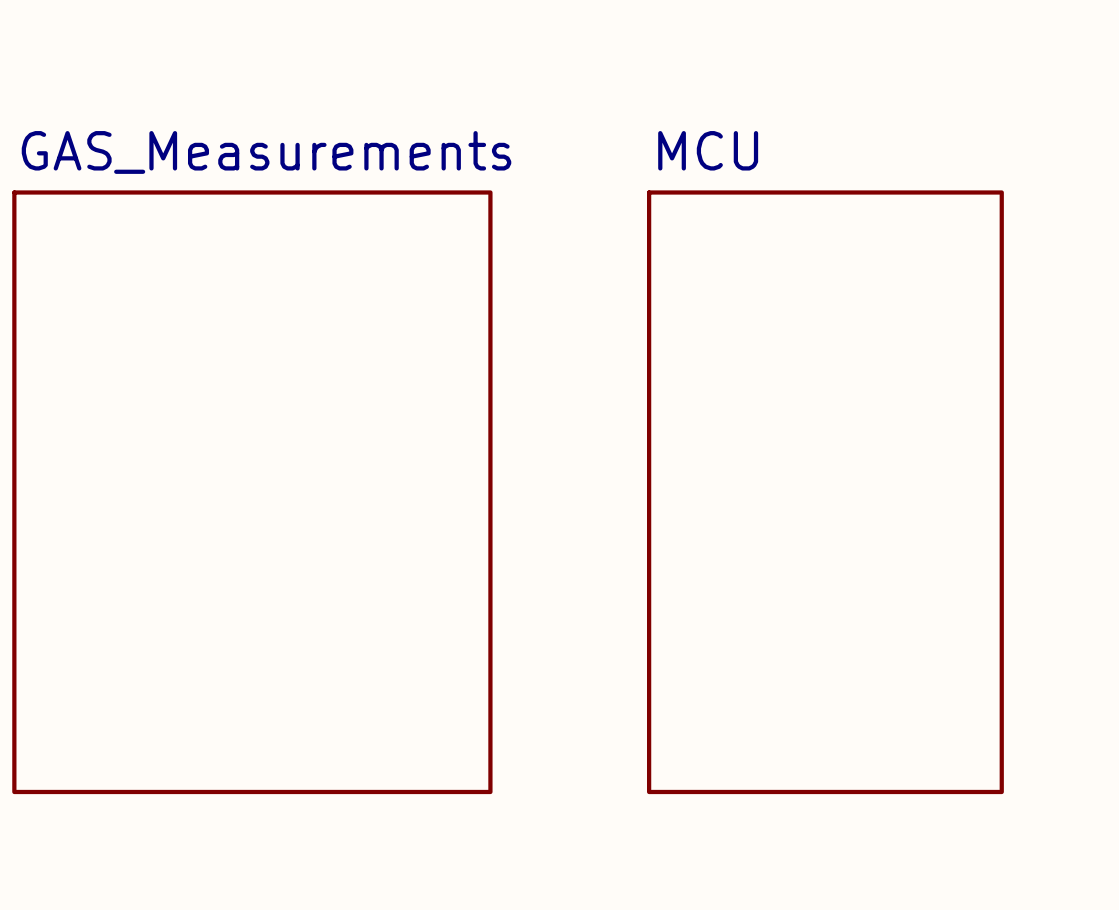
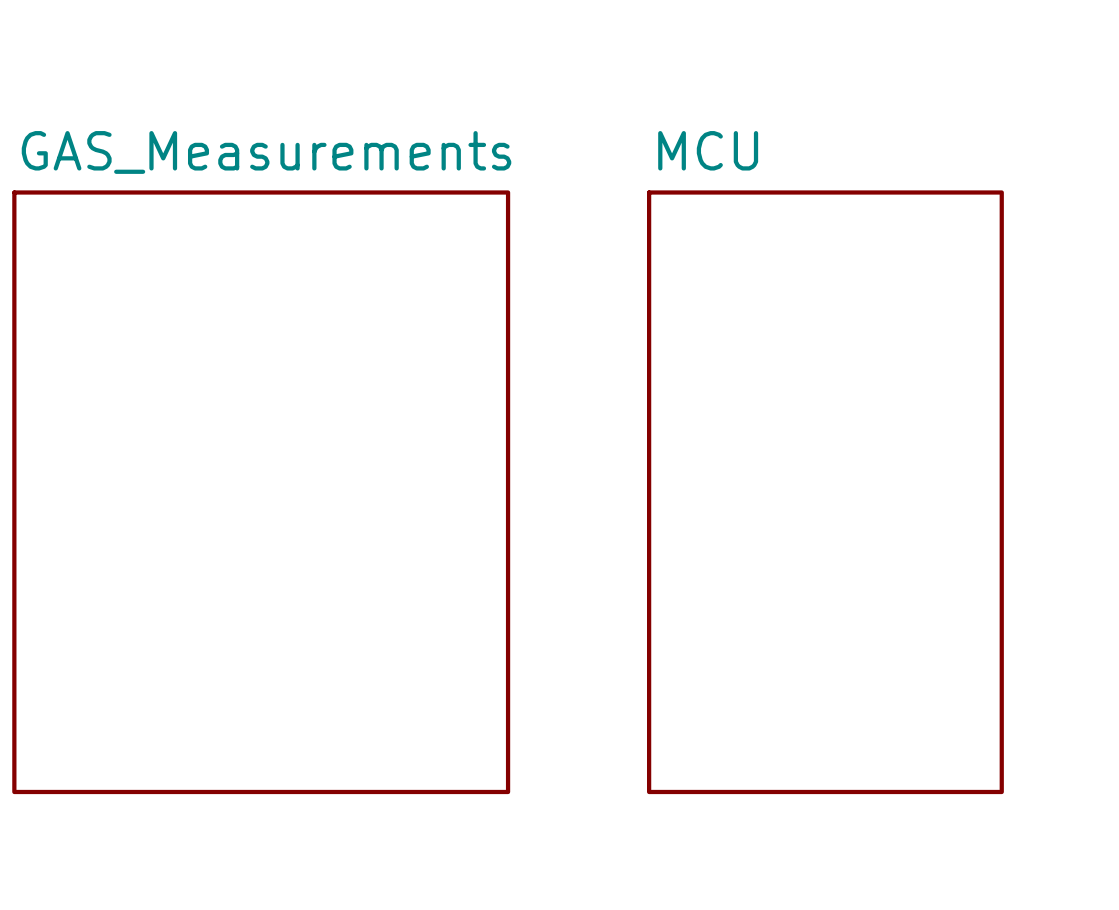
sheet GAS_Measurements shape: [12, 190, 493, 795] -> [12, 190, 511, 795]

